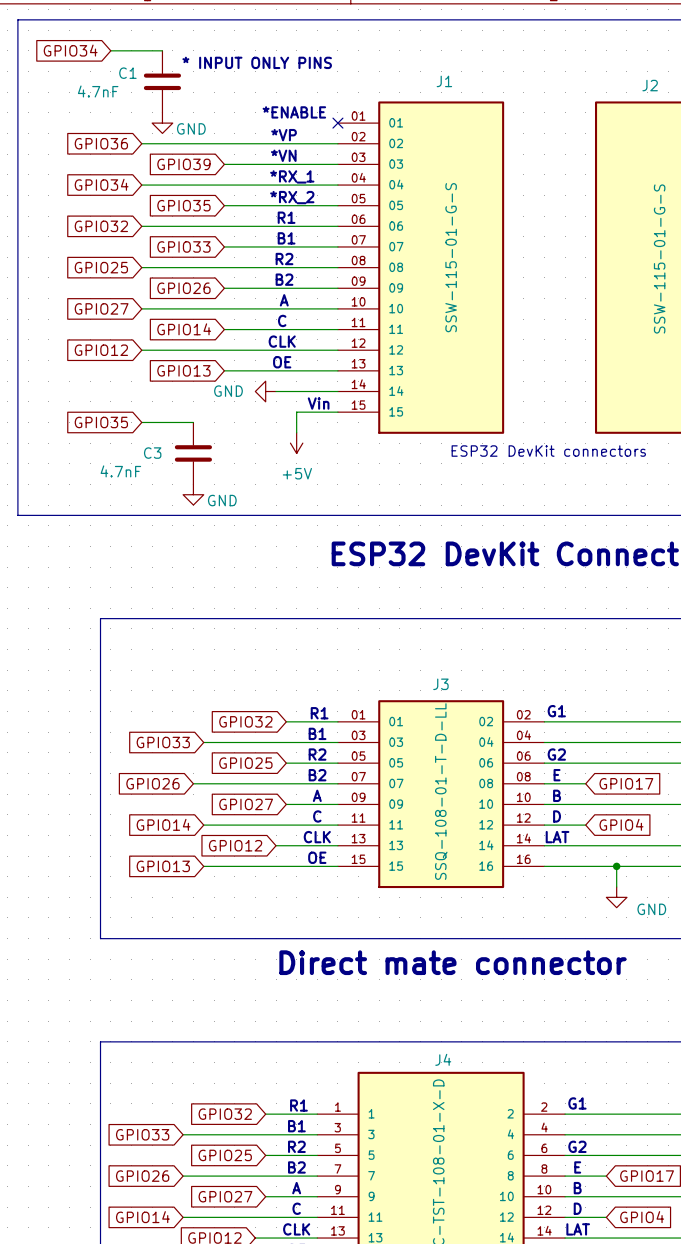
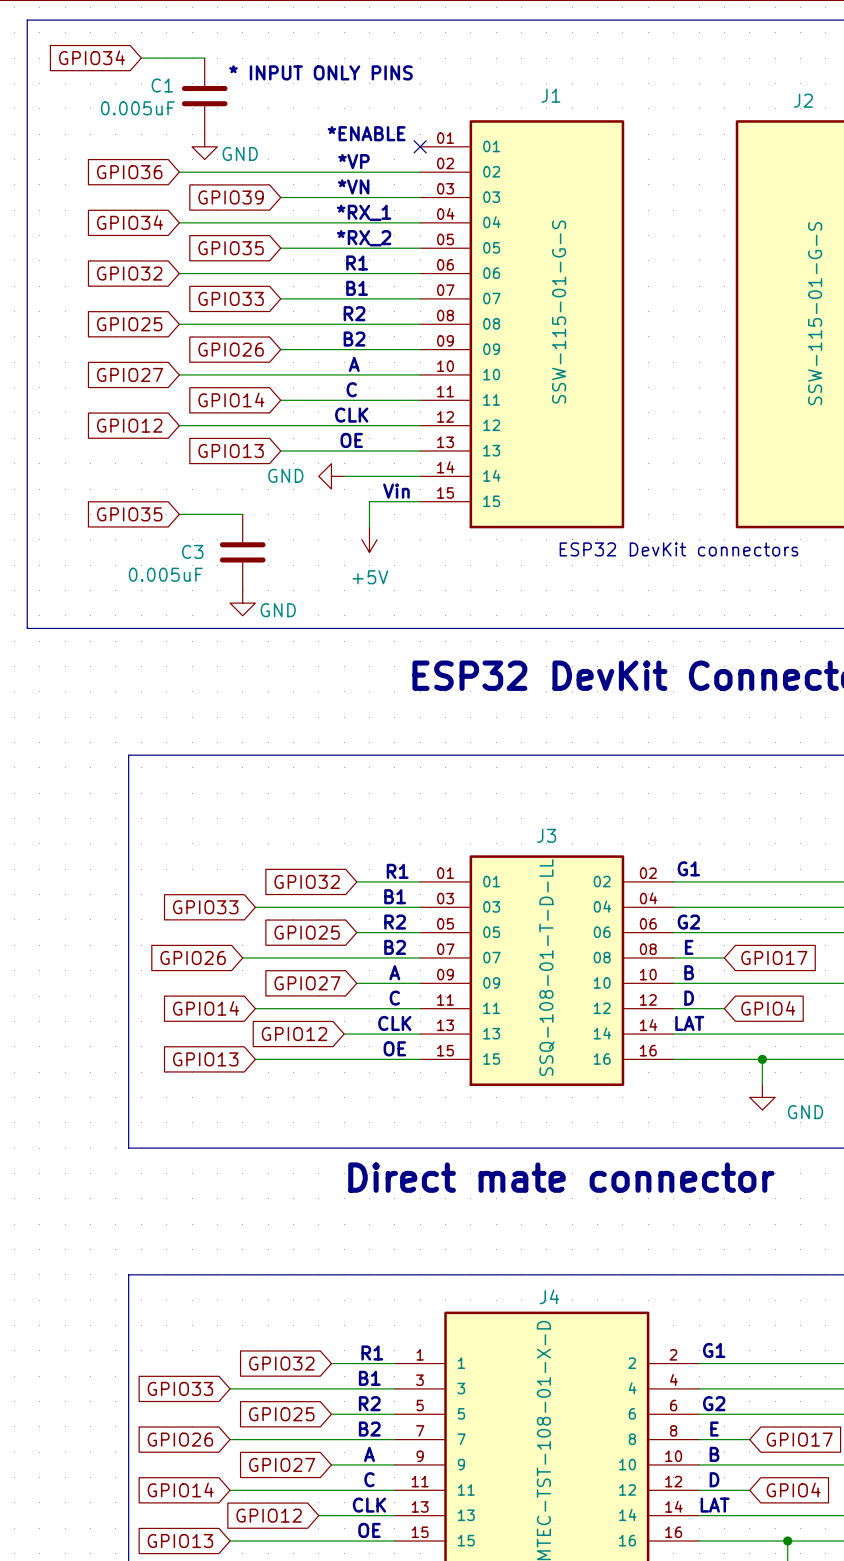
C1 value: 4.7nF (98, 91) -> 0.005uF (137, 108)
C3 value: 4.7nF (120, 471) -> 0.005uF (165, 574)

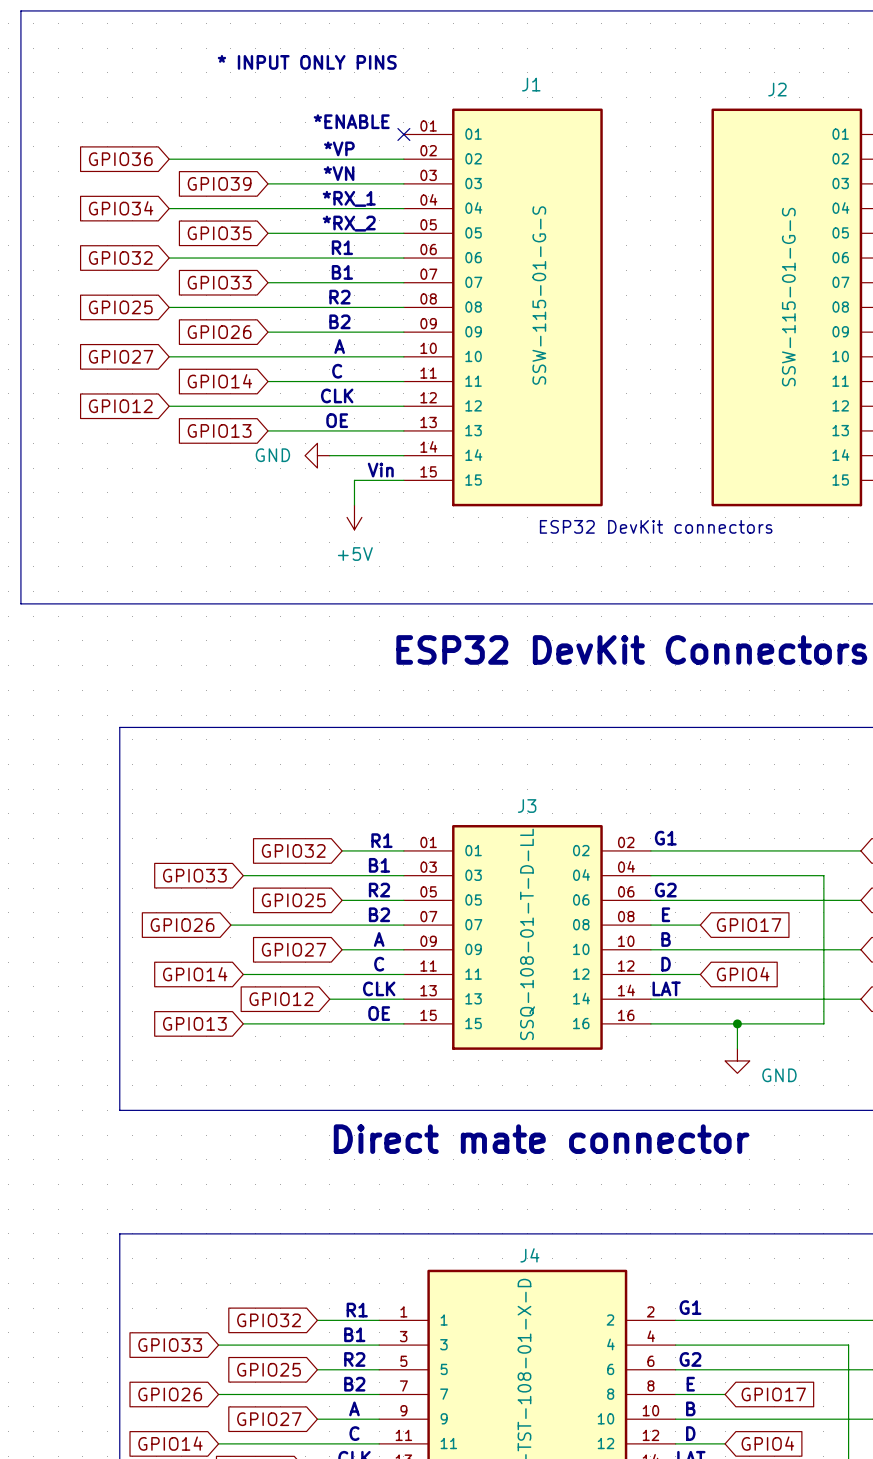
global label: GPIO34 (91, 57) -> none
wire: (141, 58) (204, 58) -> none
C1: 0.005uF (204, 96) -> none
power symbol: GND (204, 146) -> none
global label: GPIO35 (129, 514) -> none
wire: (179, 514) (242, 514) -> none
C3: 0.005uF (242, 552) -> none
power symbol: GND (242, 603) -> none

